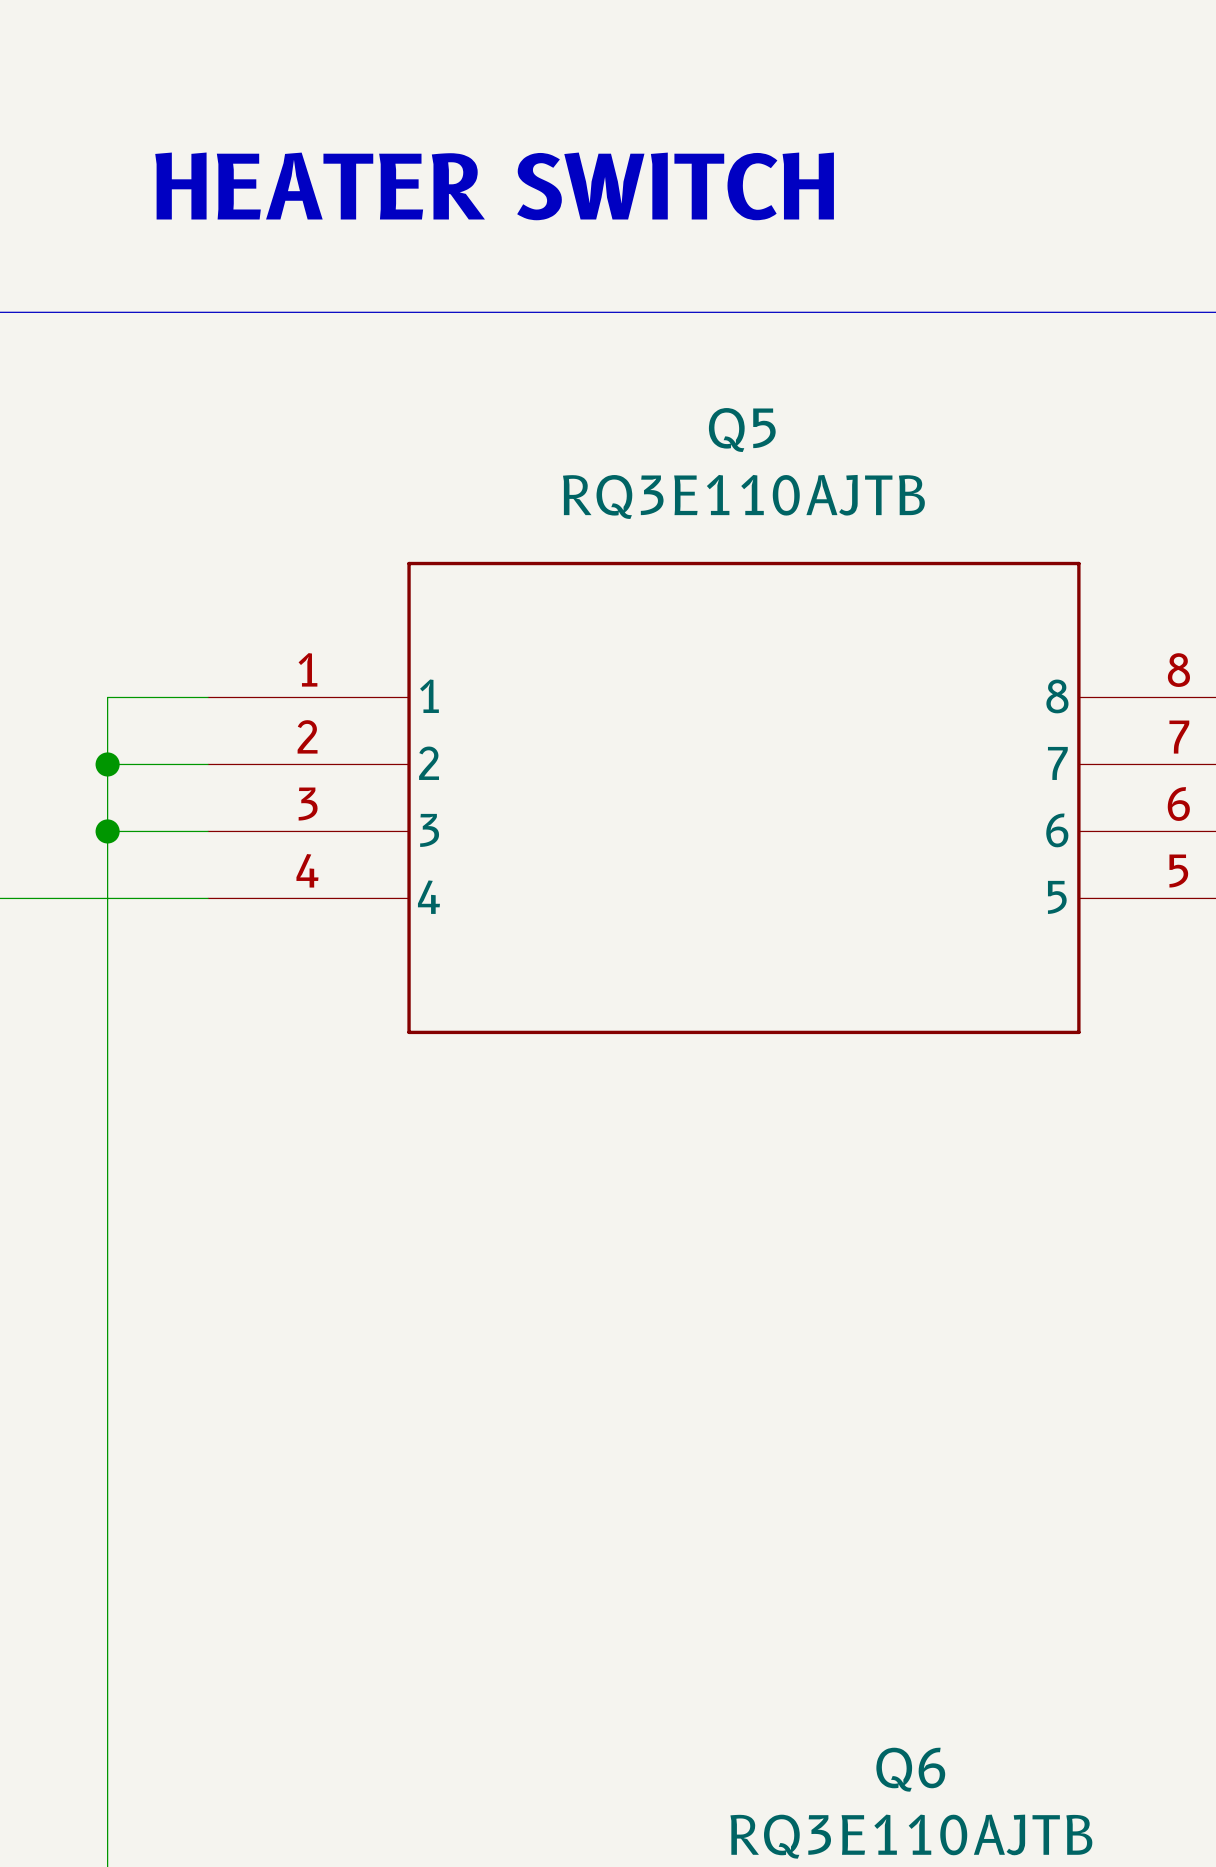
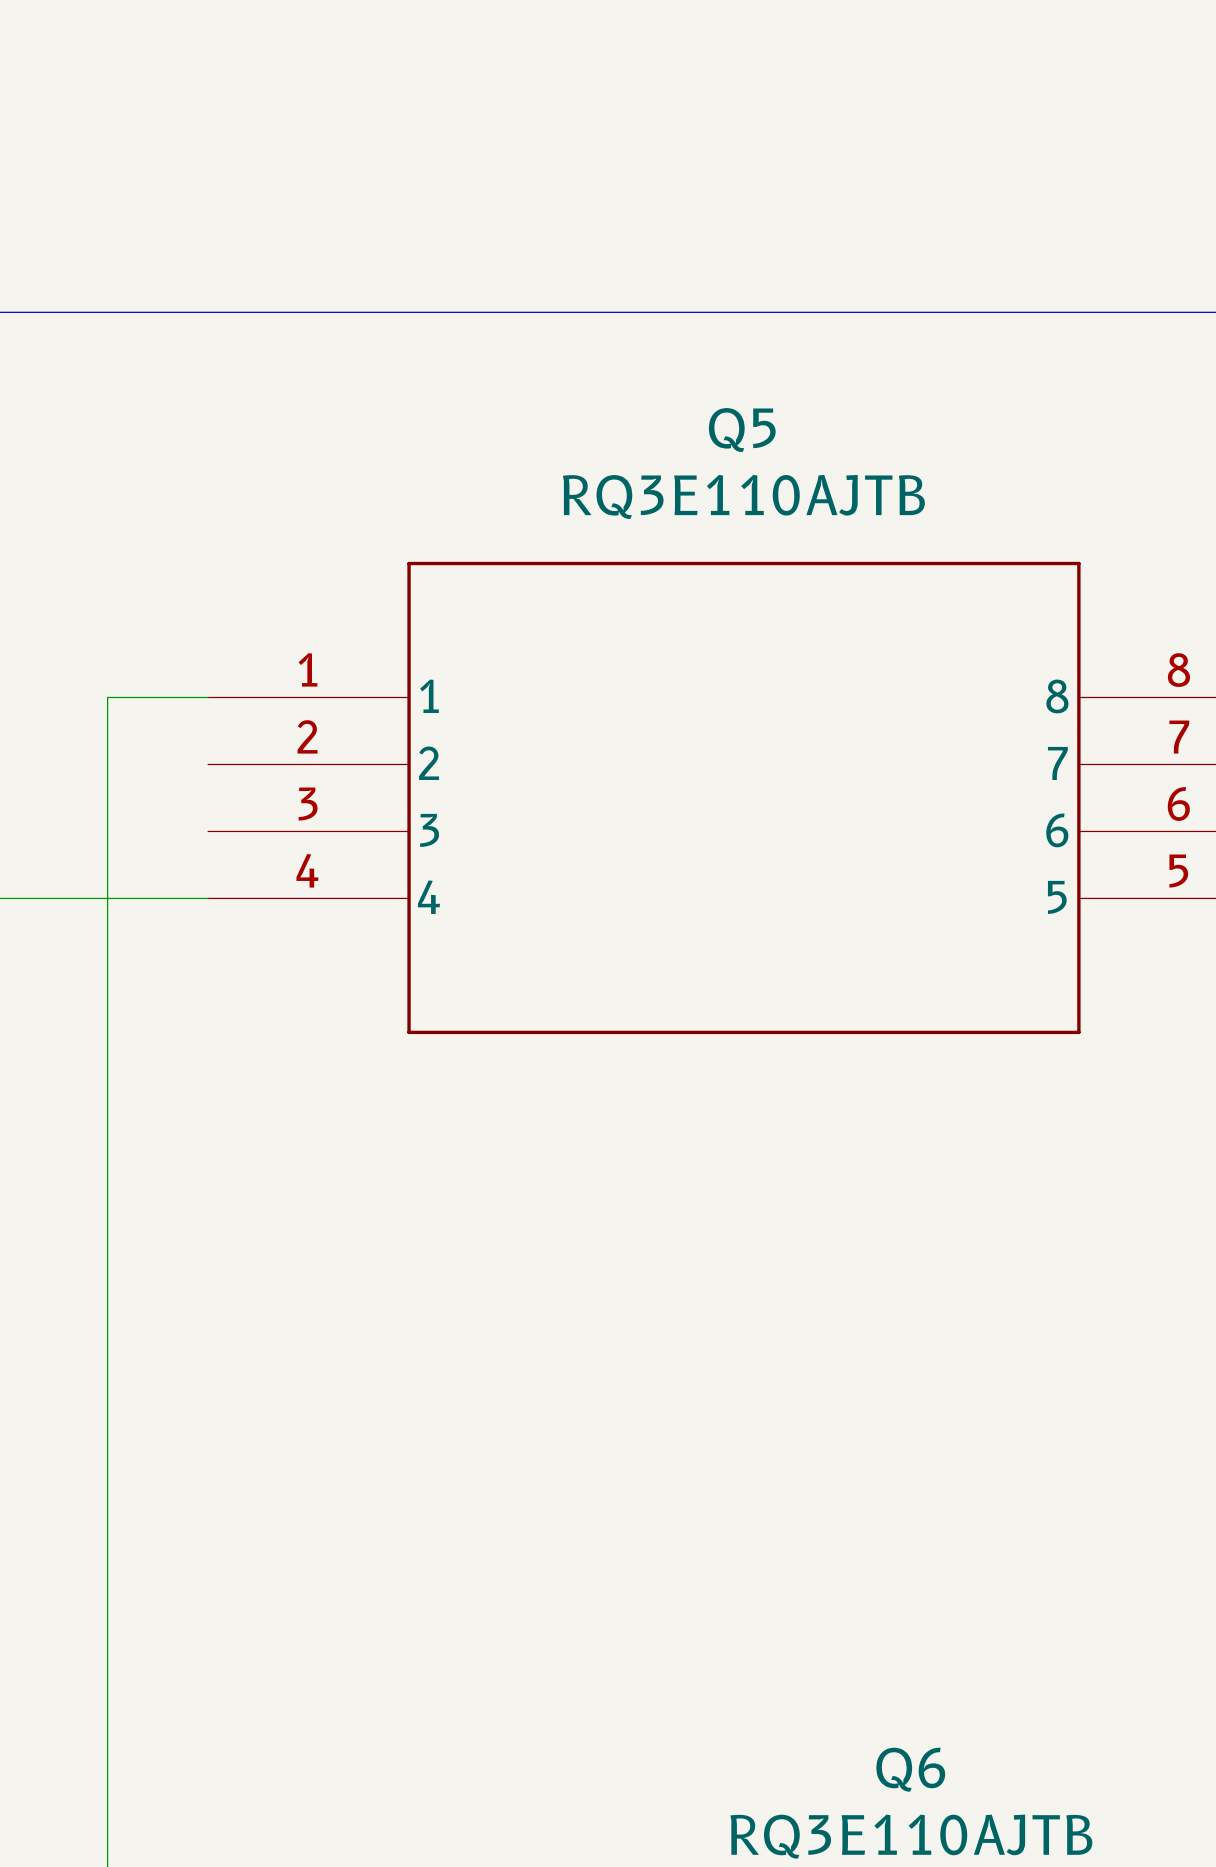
text: HEATER SWITCH (494, 186) -> none
wire: (107, 764) (208, 764) -> none
junction: (107, 764) -> none
wire: (107, 831) (208, 831) -> none
junction: (107, 831) -> none

